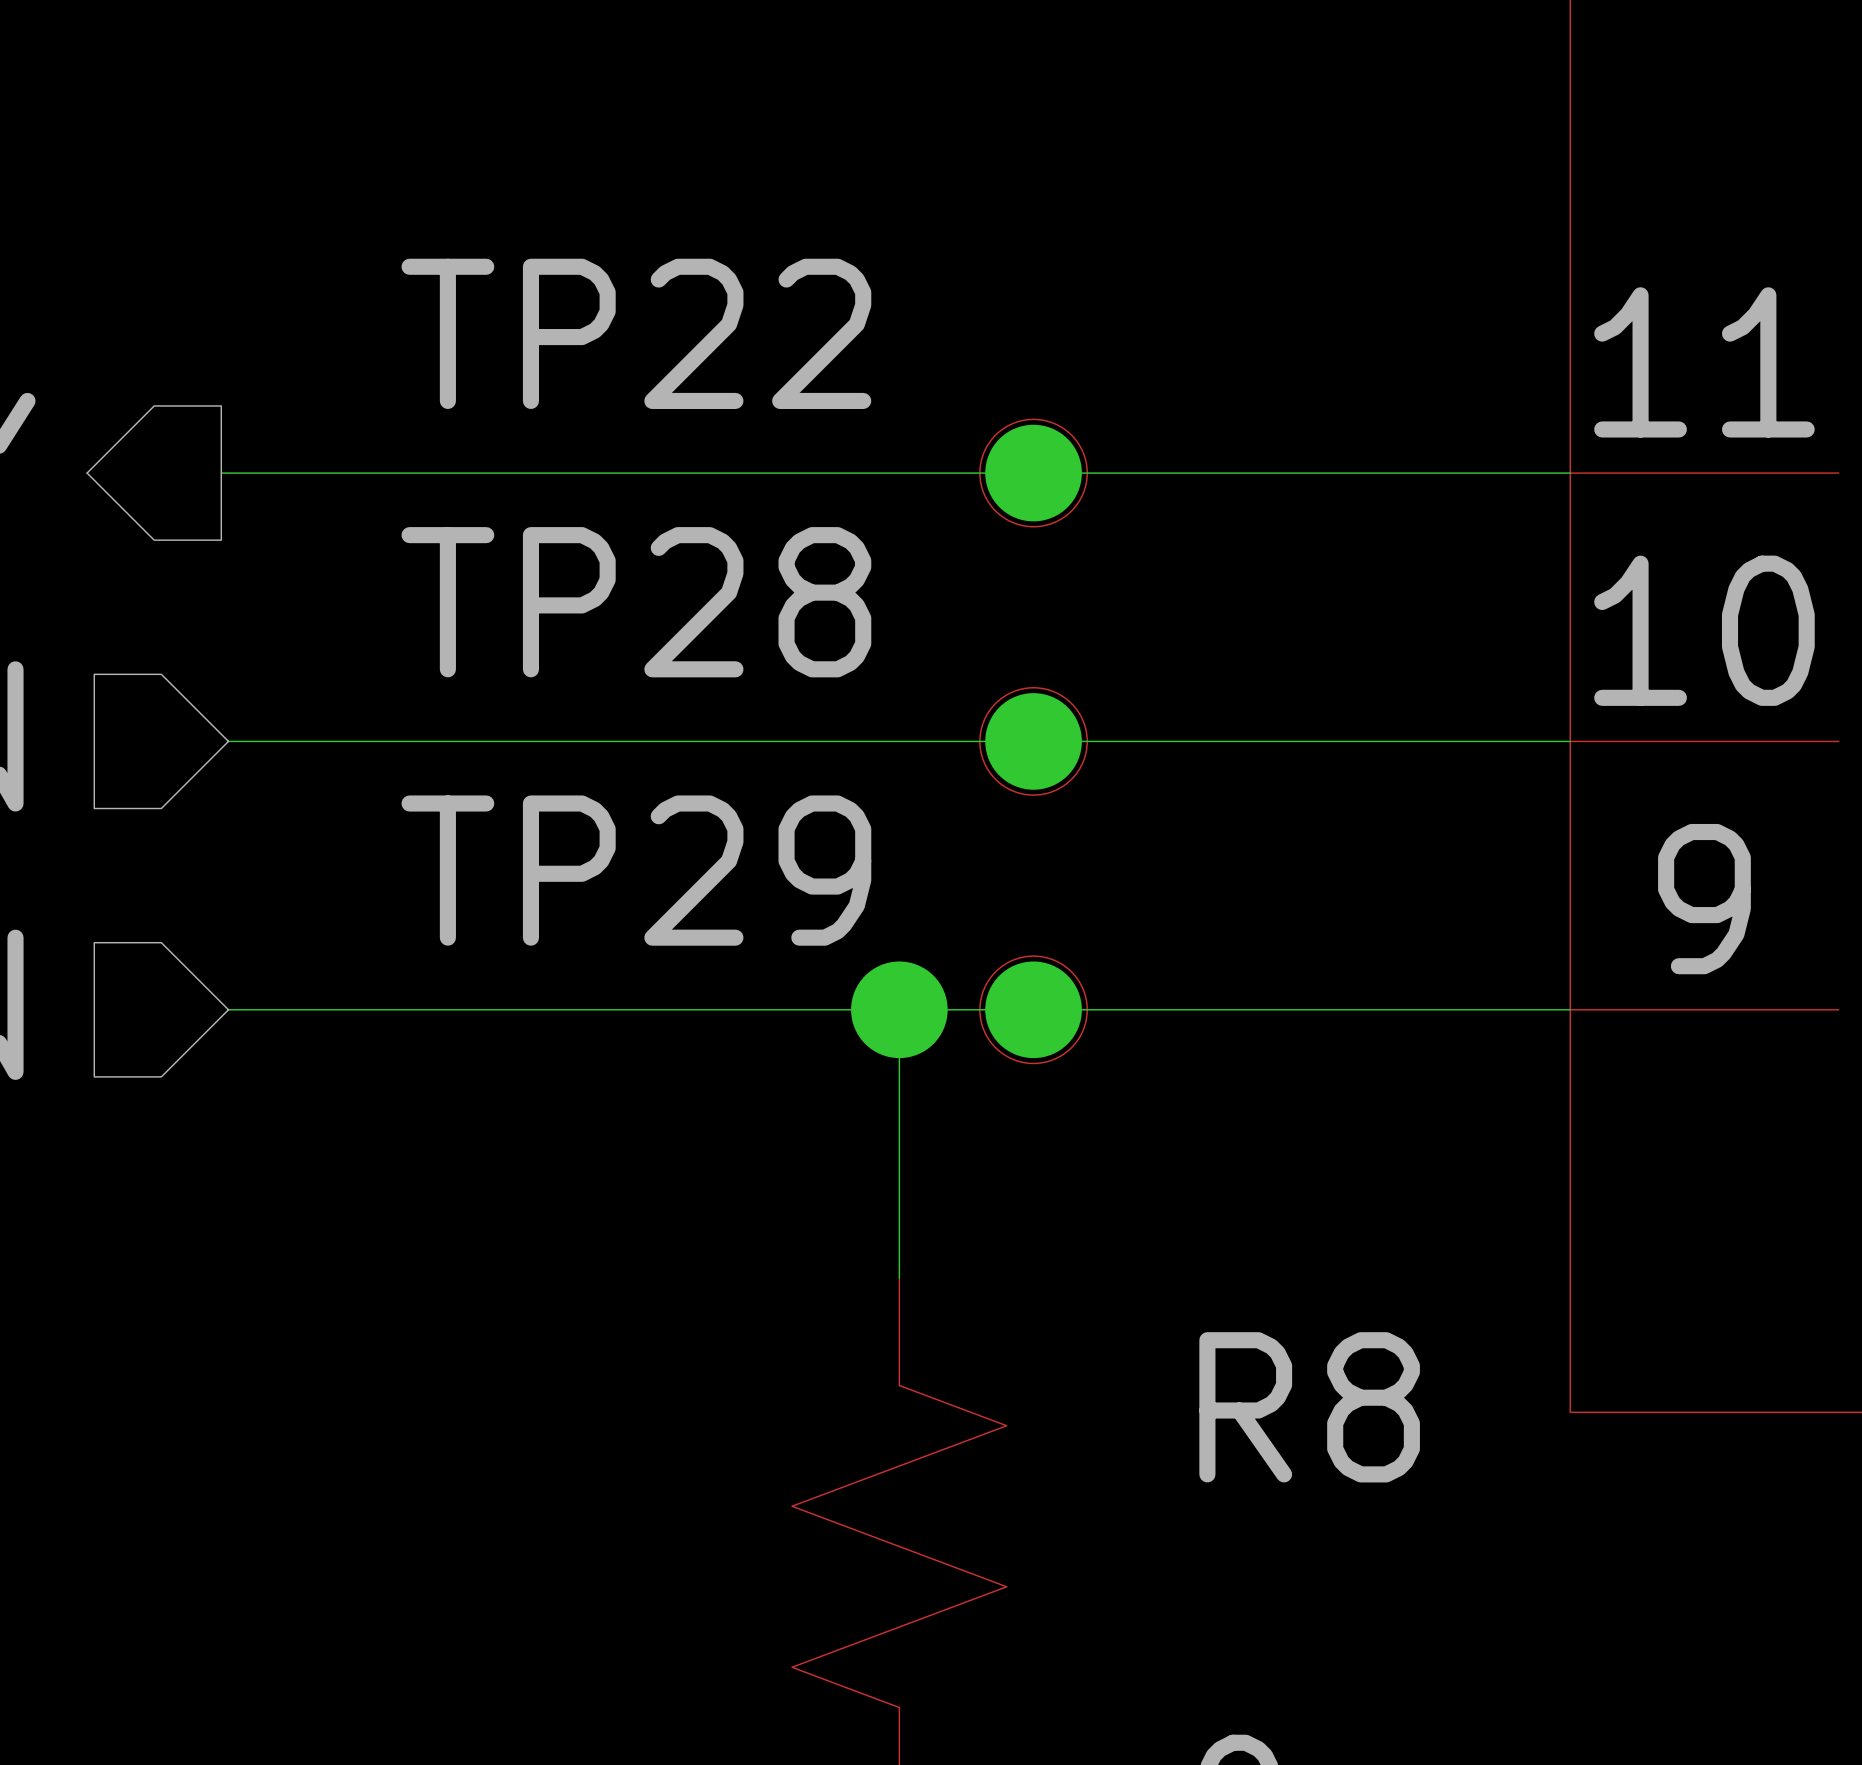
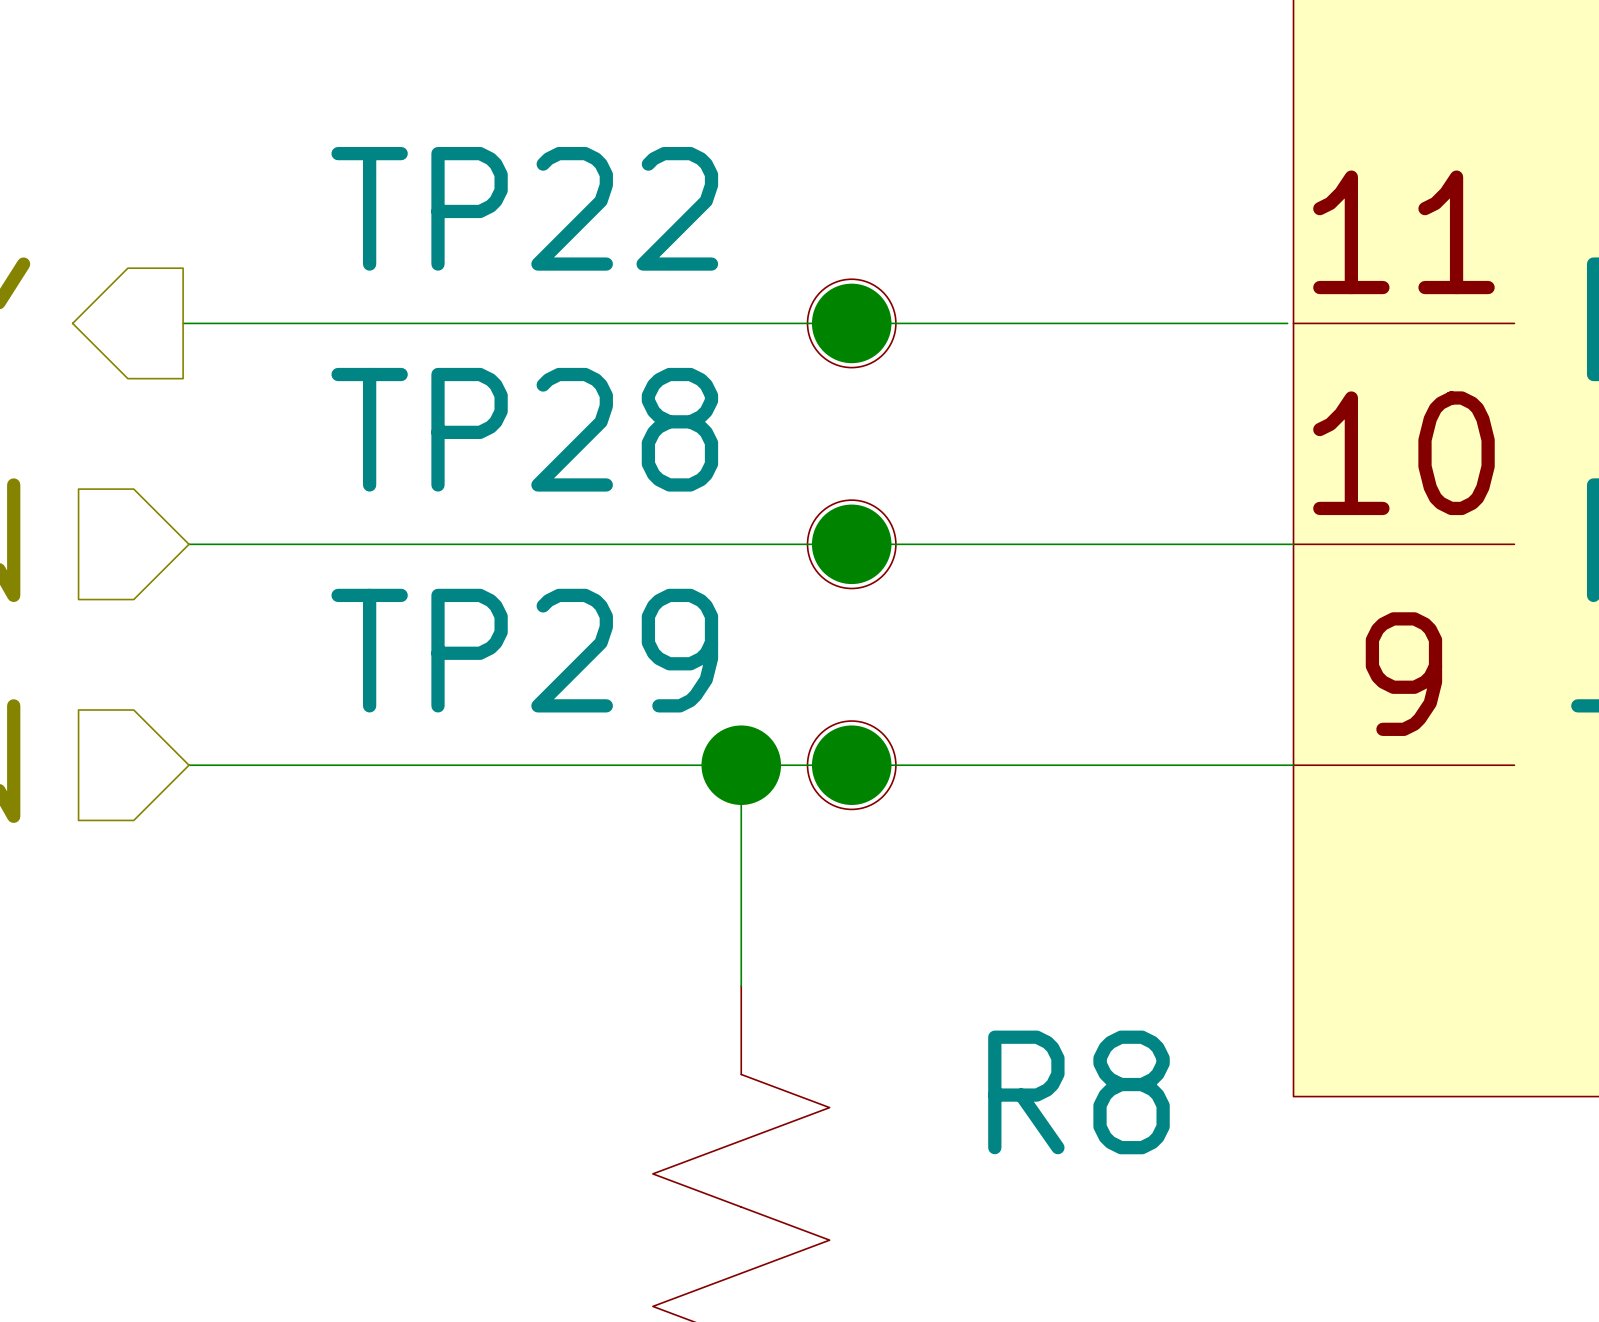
wire: (1563, 473) (1570, 473) -> none

